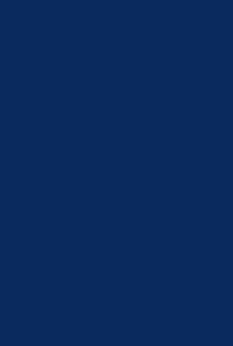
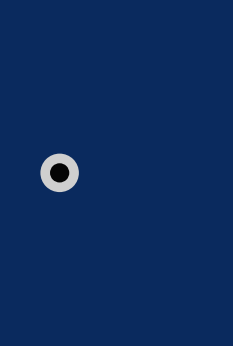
part: none -> (59, 172)

